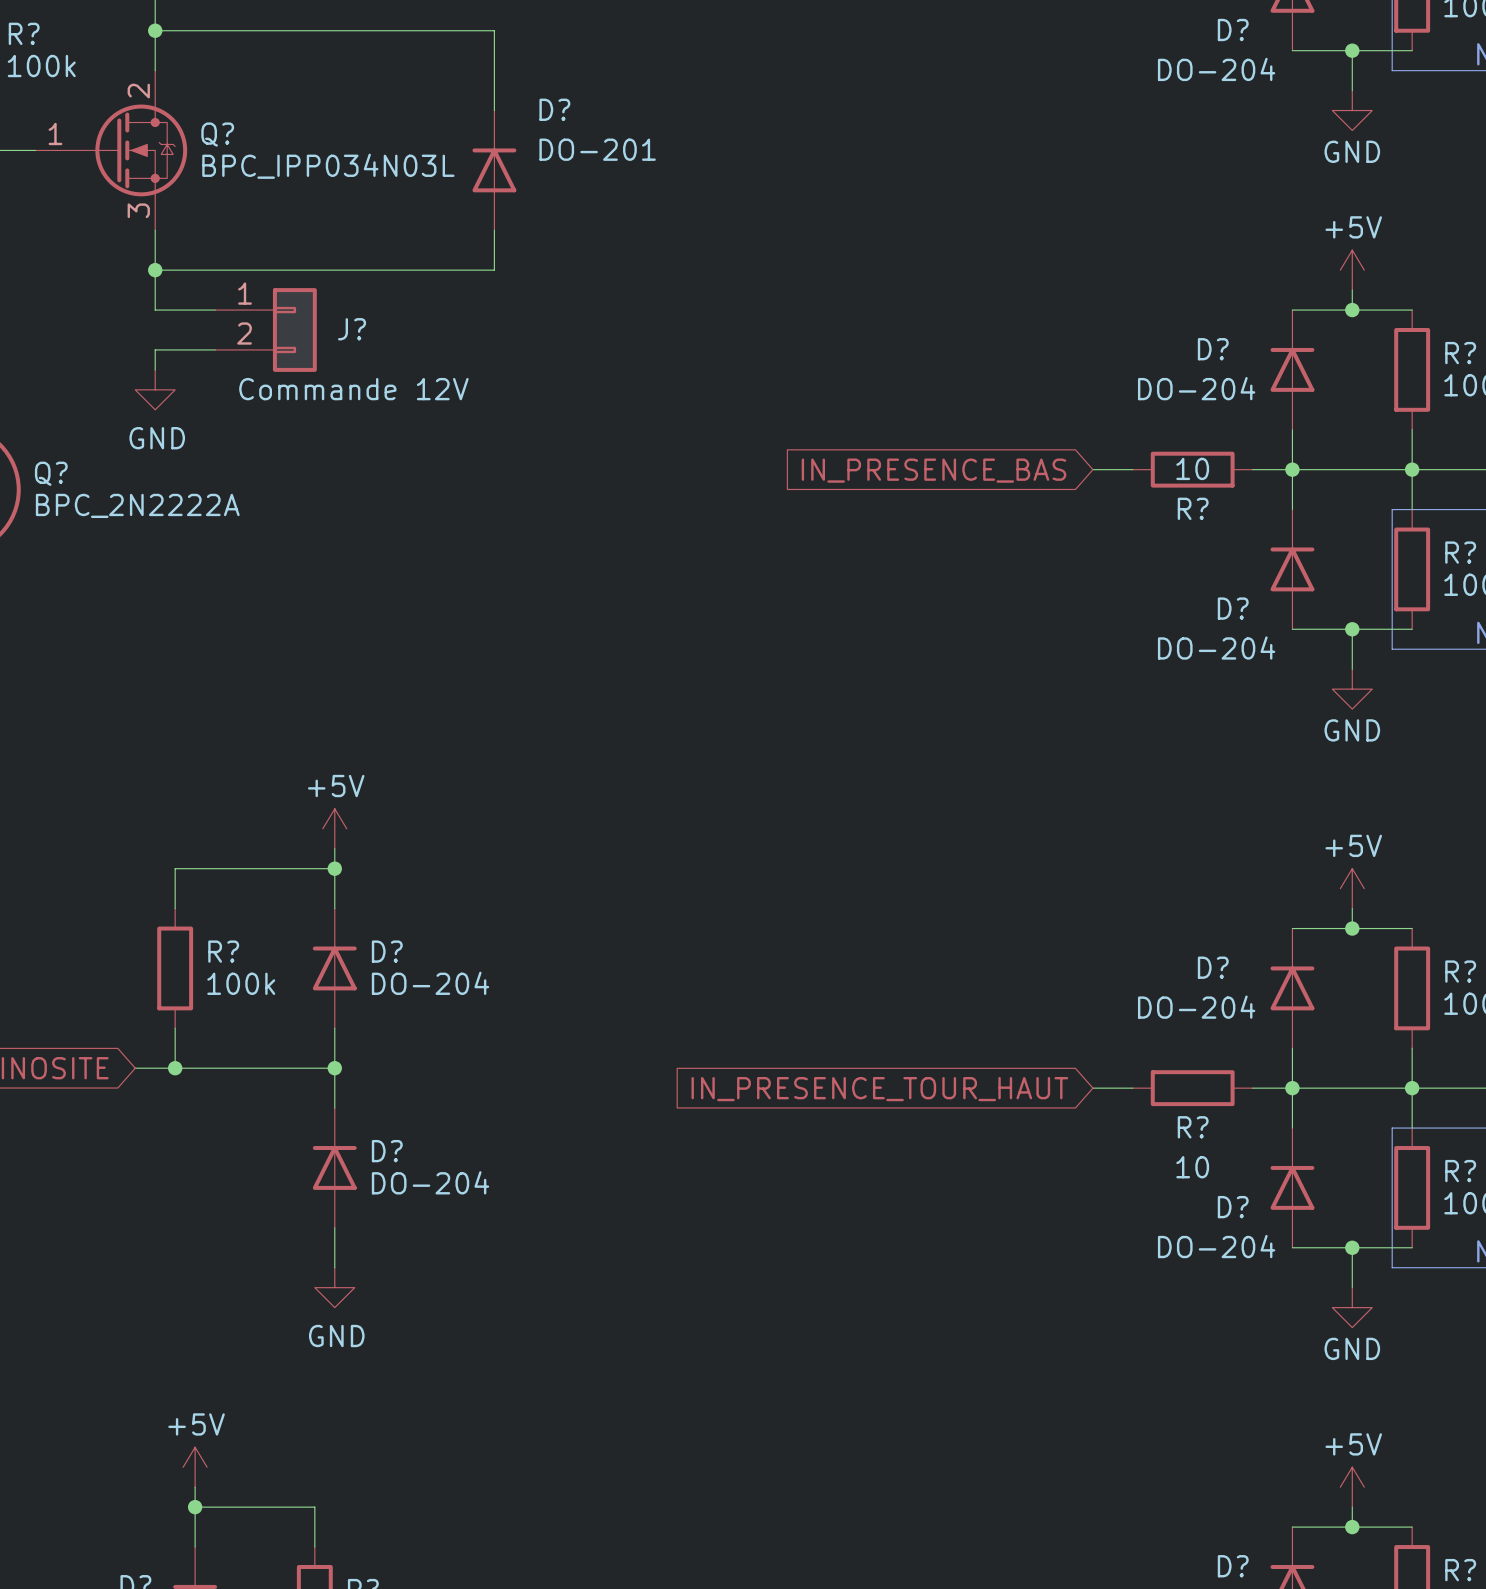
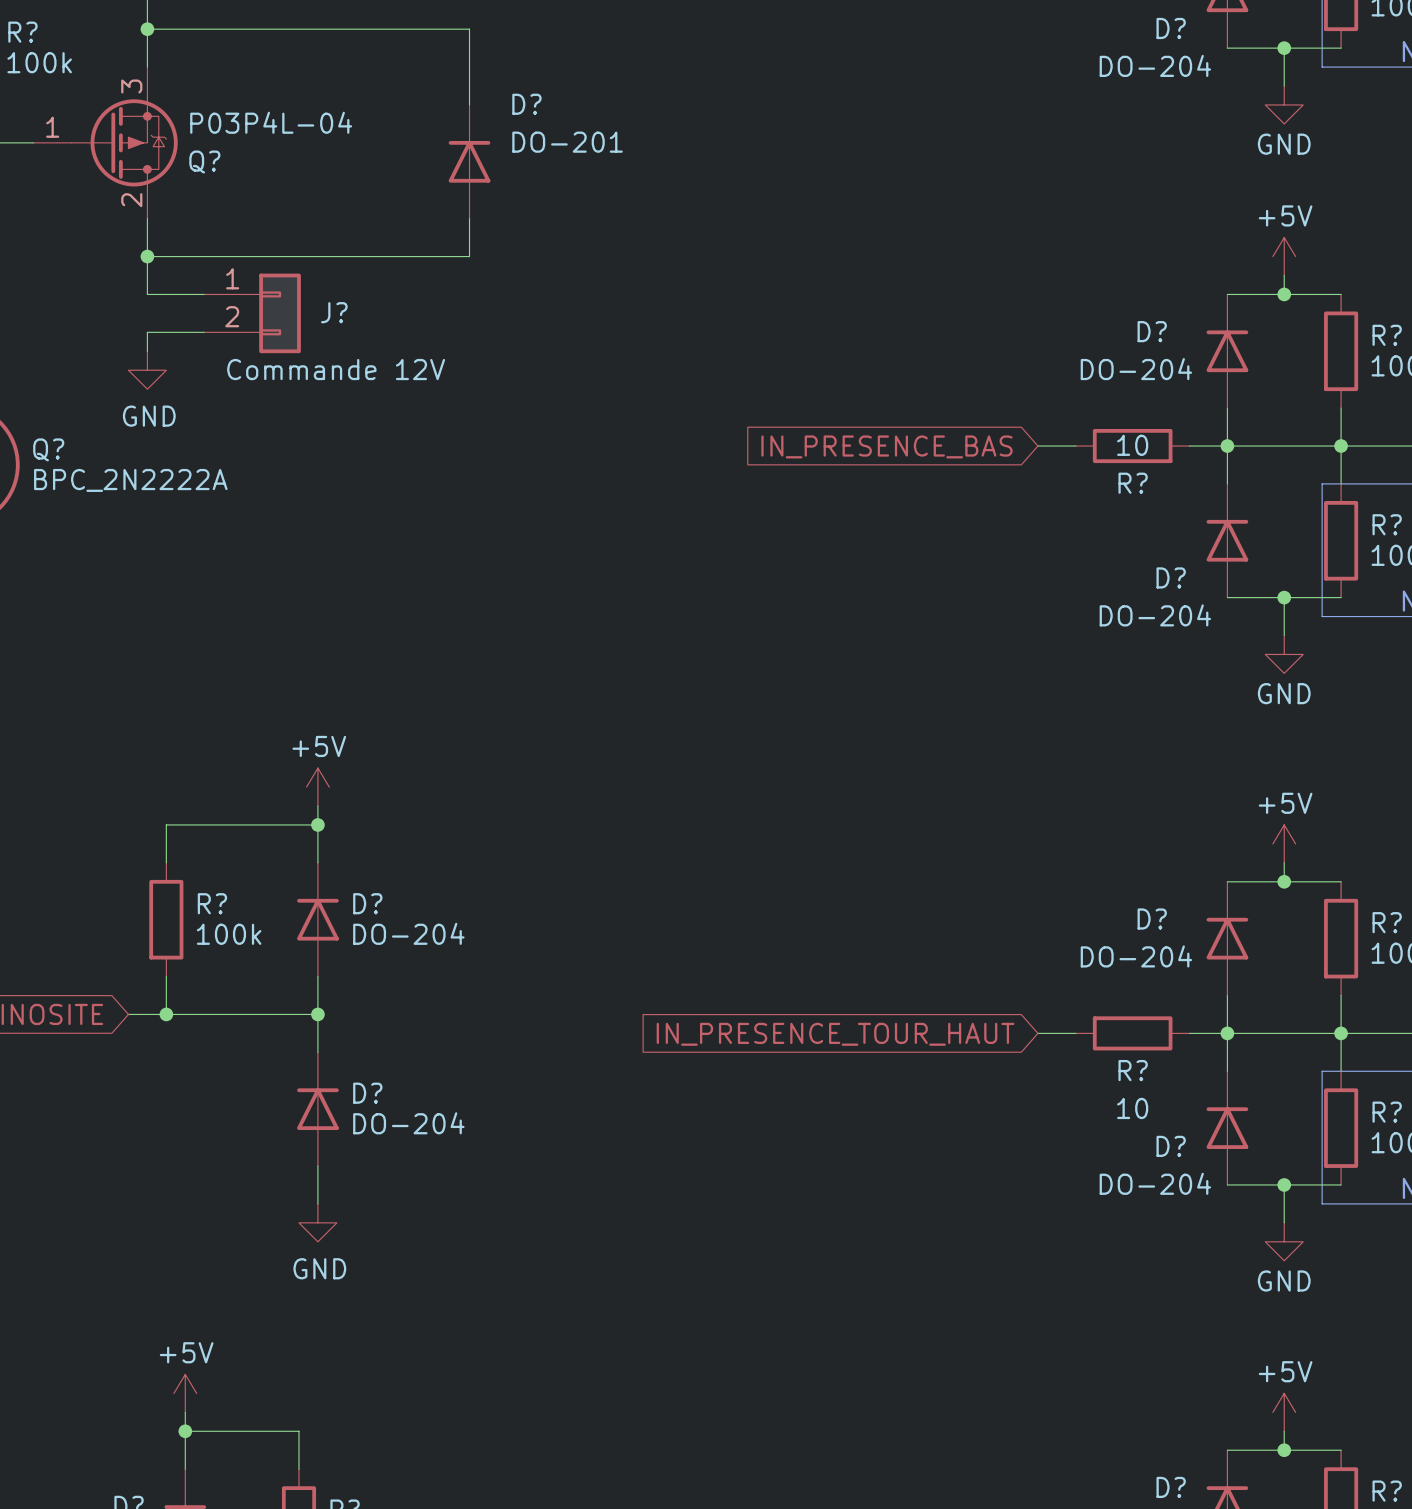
Q? symbol: [35, 70, 188, 231] -> [33, 67, 178, 219]
Q? name position: Q? (217, 134) -> Q? (204, 162)
Q? value: BPC_IPP034N03L (328, 166) -> P03P4L-04 (271, 122)

